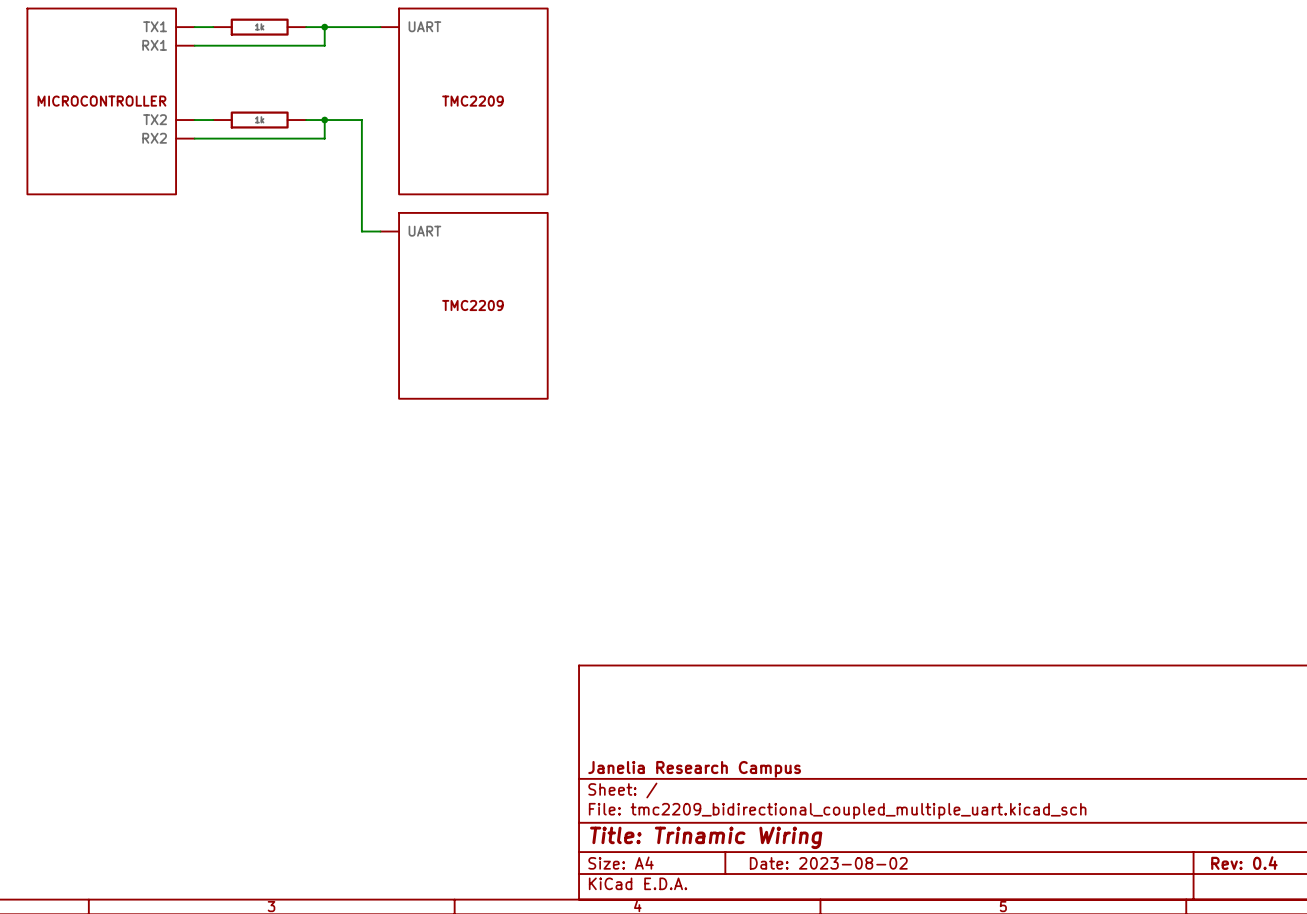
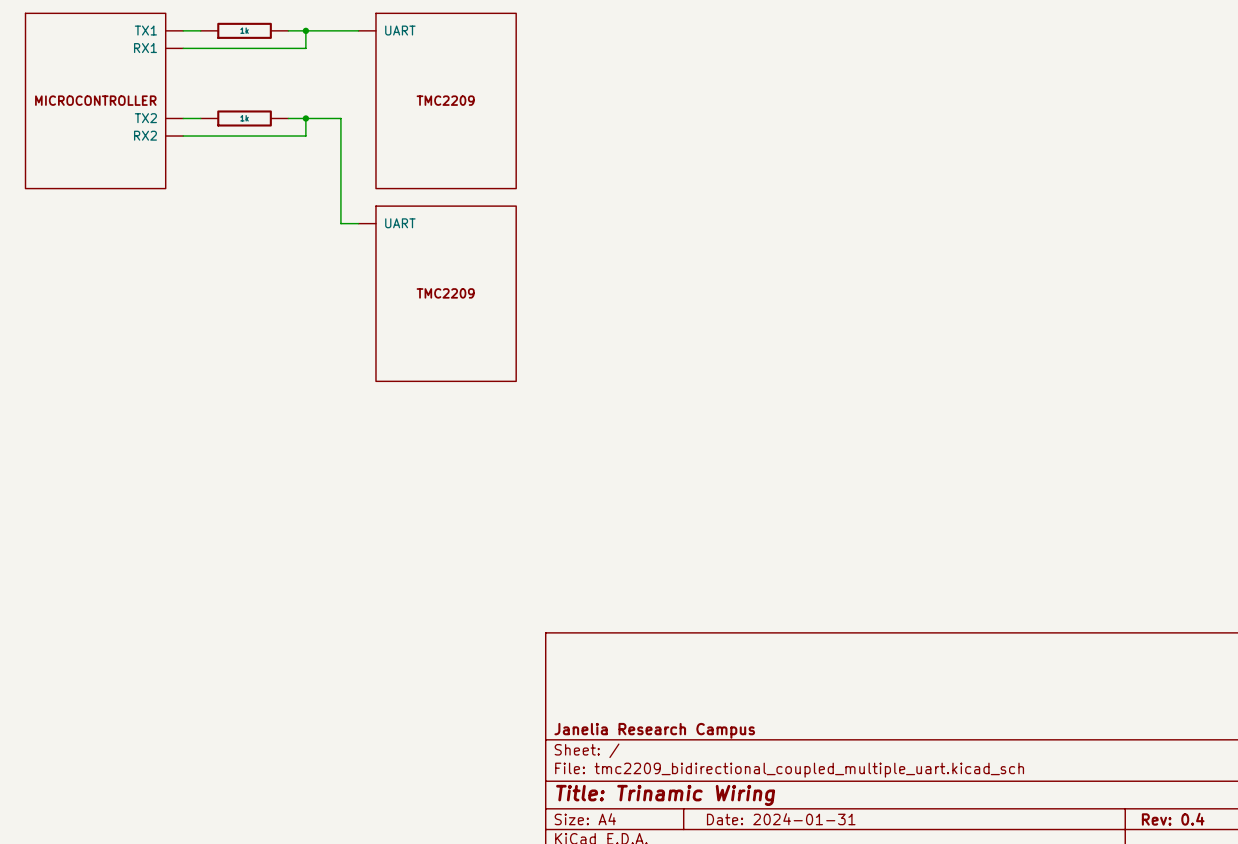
title block: Date: 2023-08-02 (828, 863) -> Date: 2024-01-31 (781, 819)

